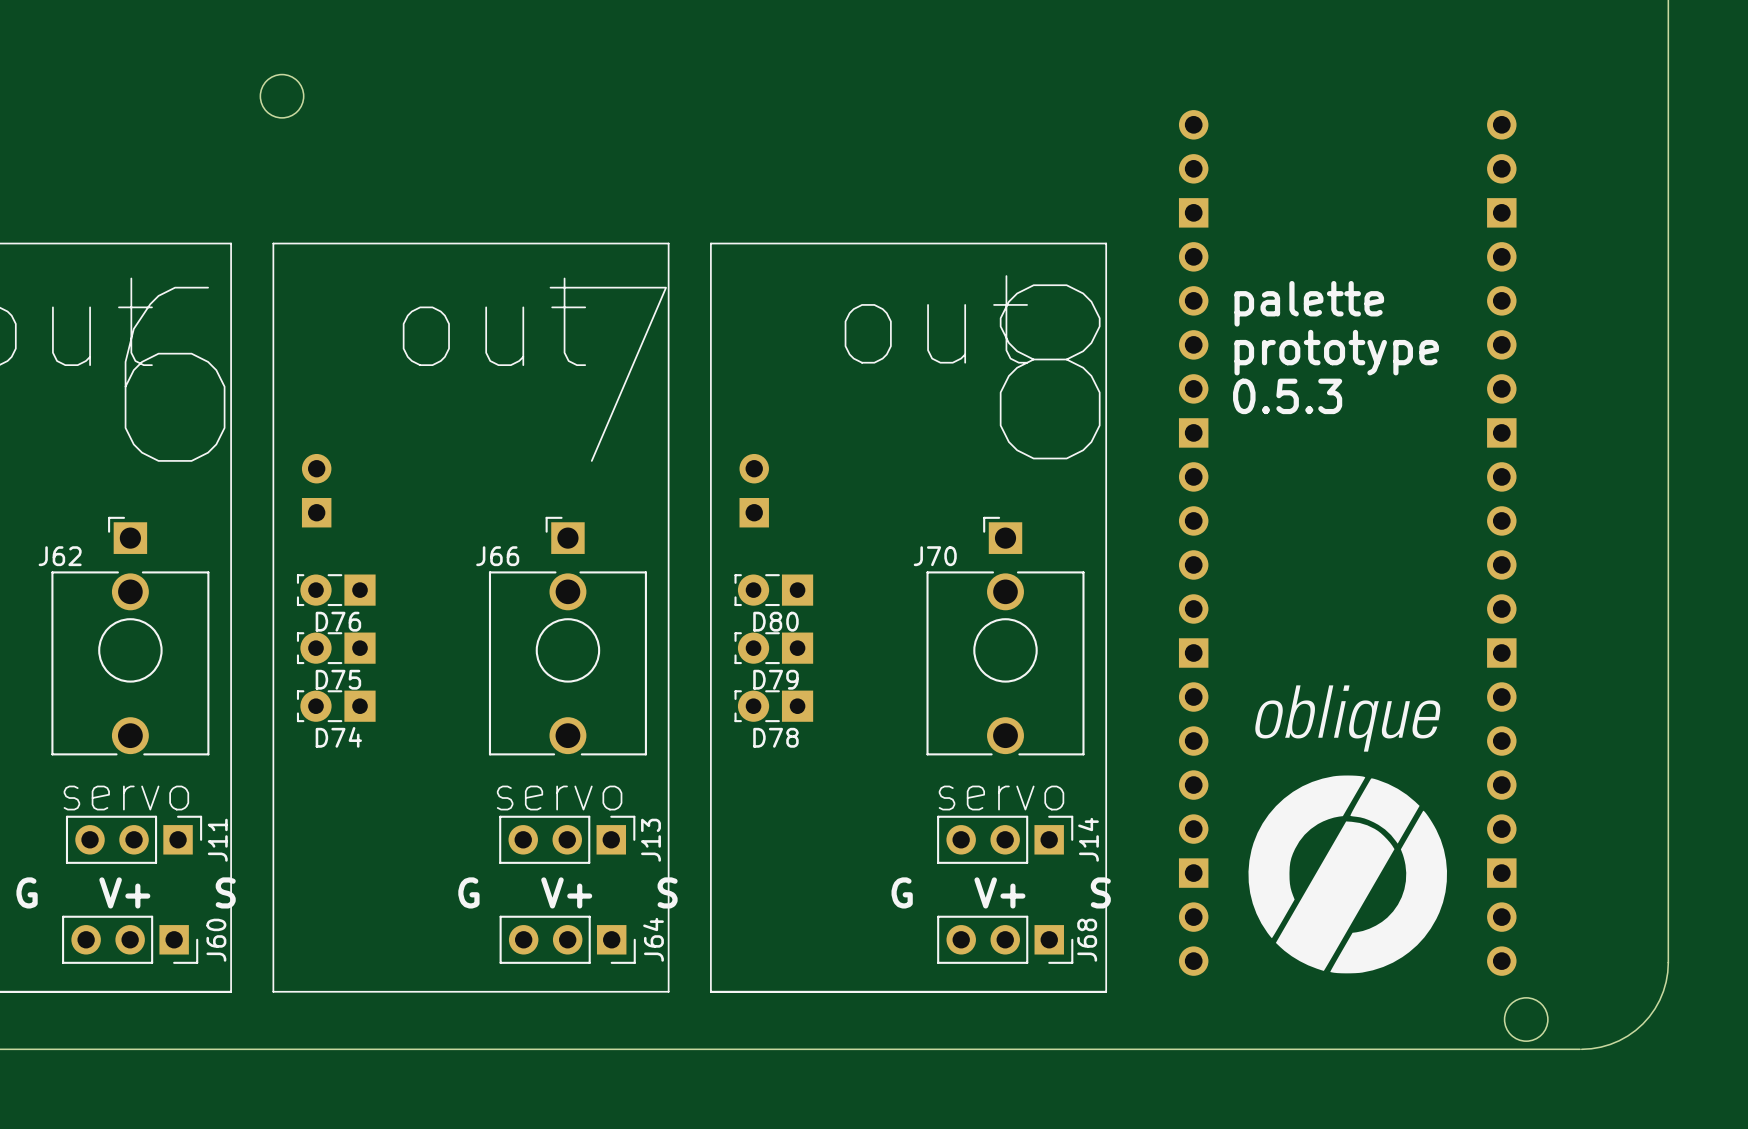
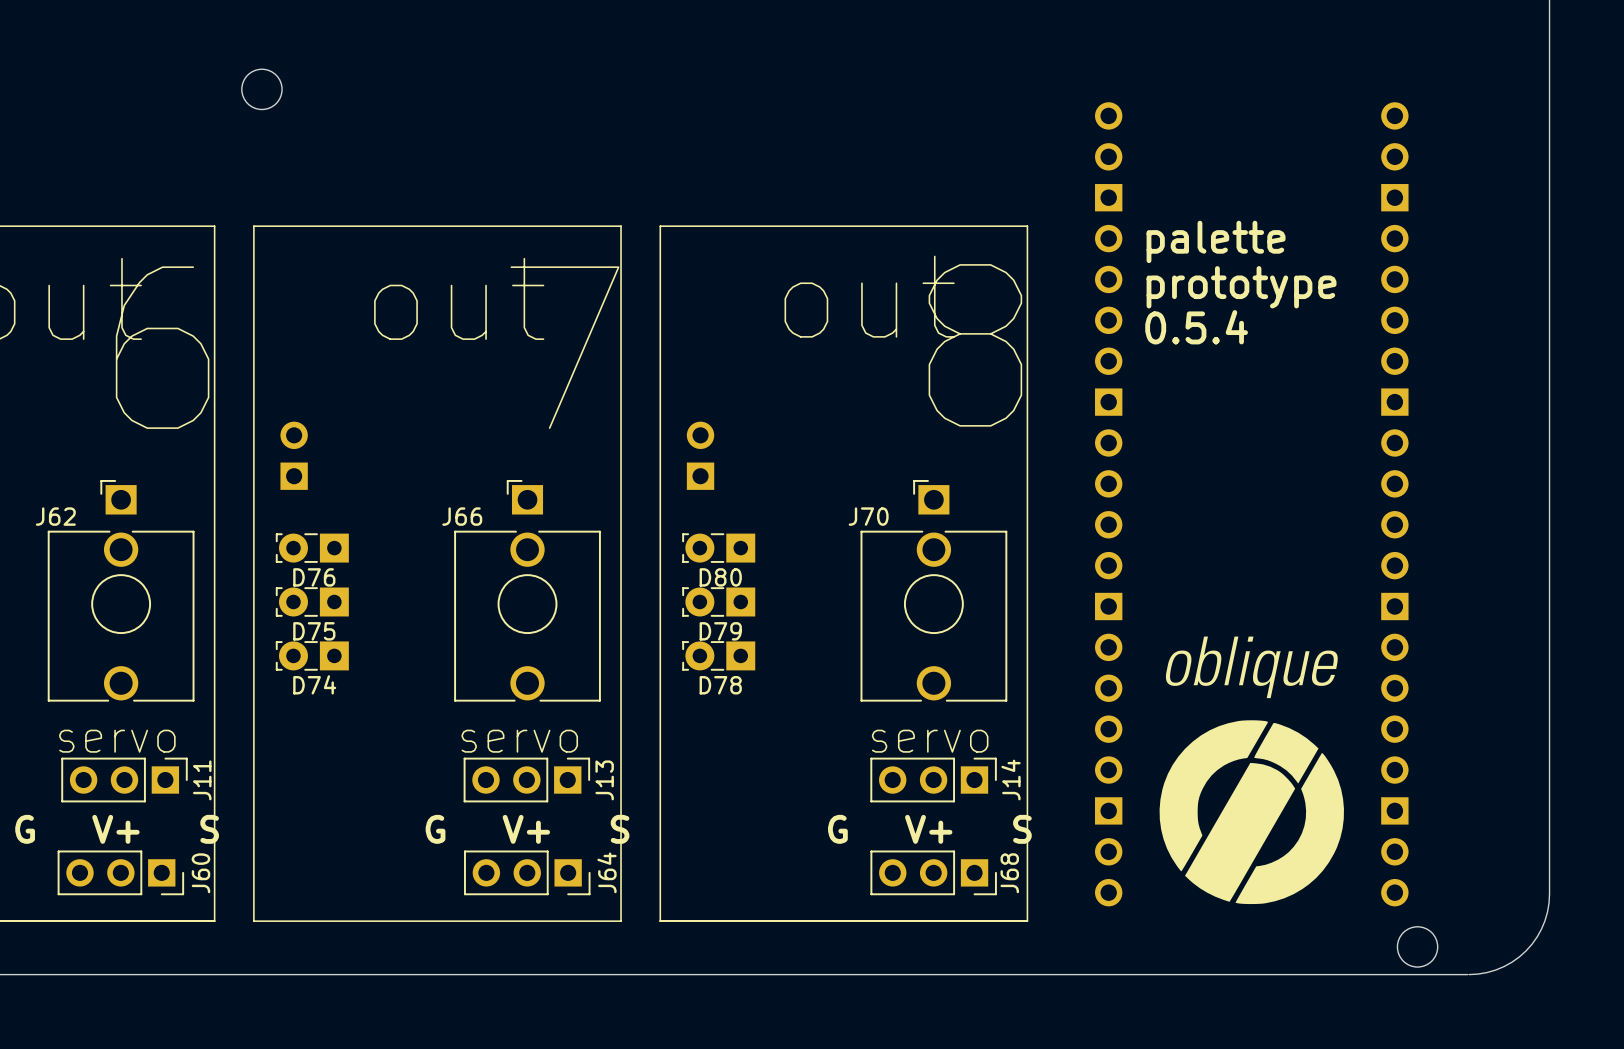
text: none -> palette (1216, 241)
text: palette (1309, 303) -> prototype (1241, 287)
text: prototype (1336, 352) -> 0.5.4 (1196, 327)
text: 0.5.3 (1287, 396) -> none

